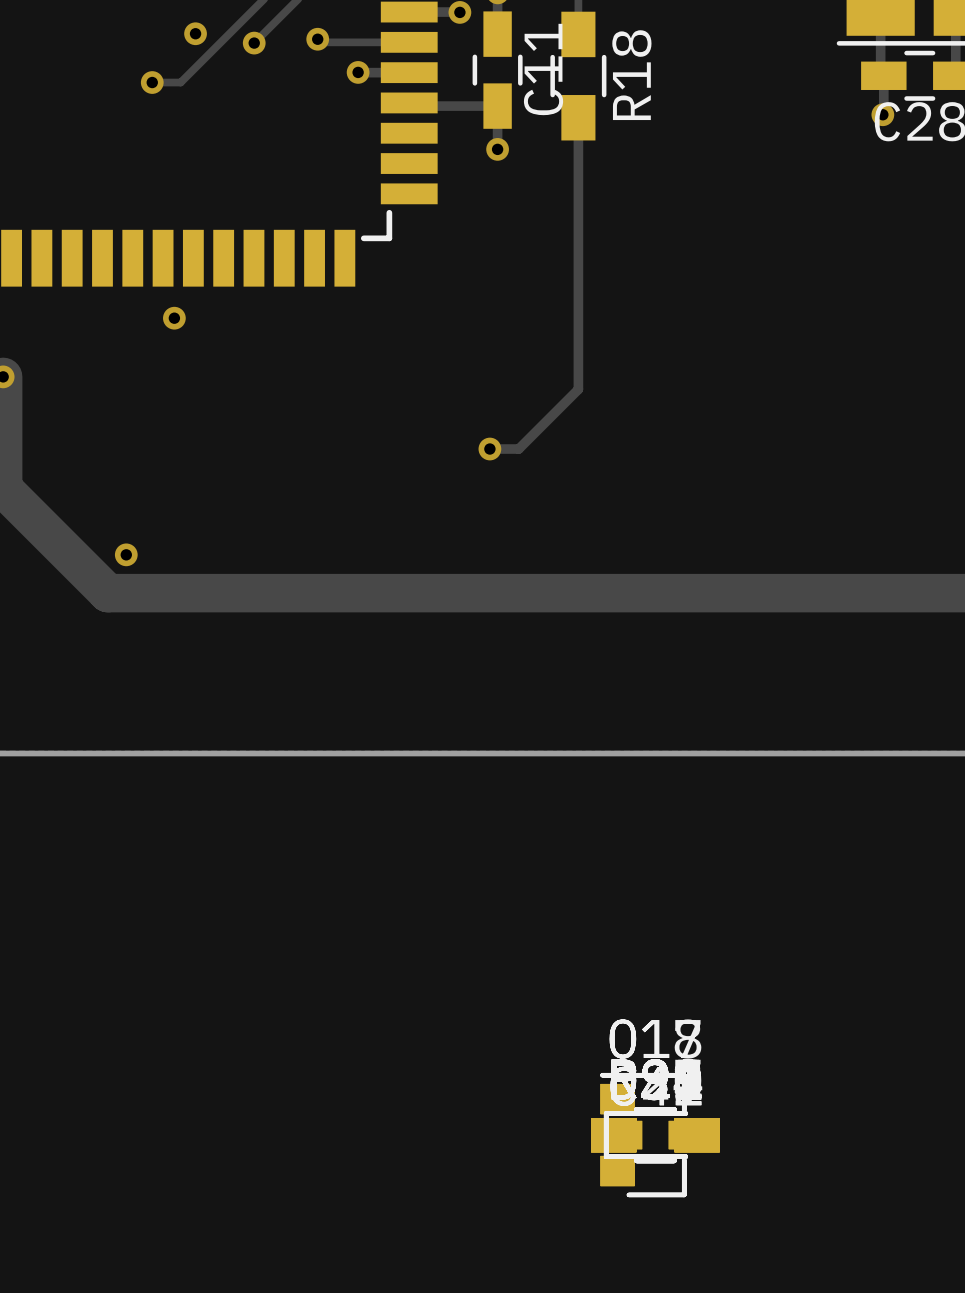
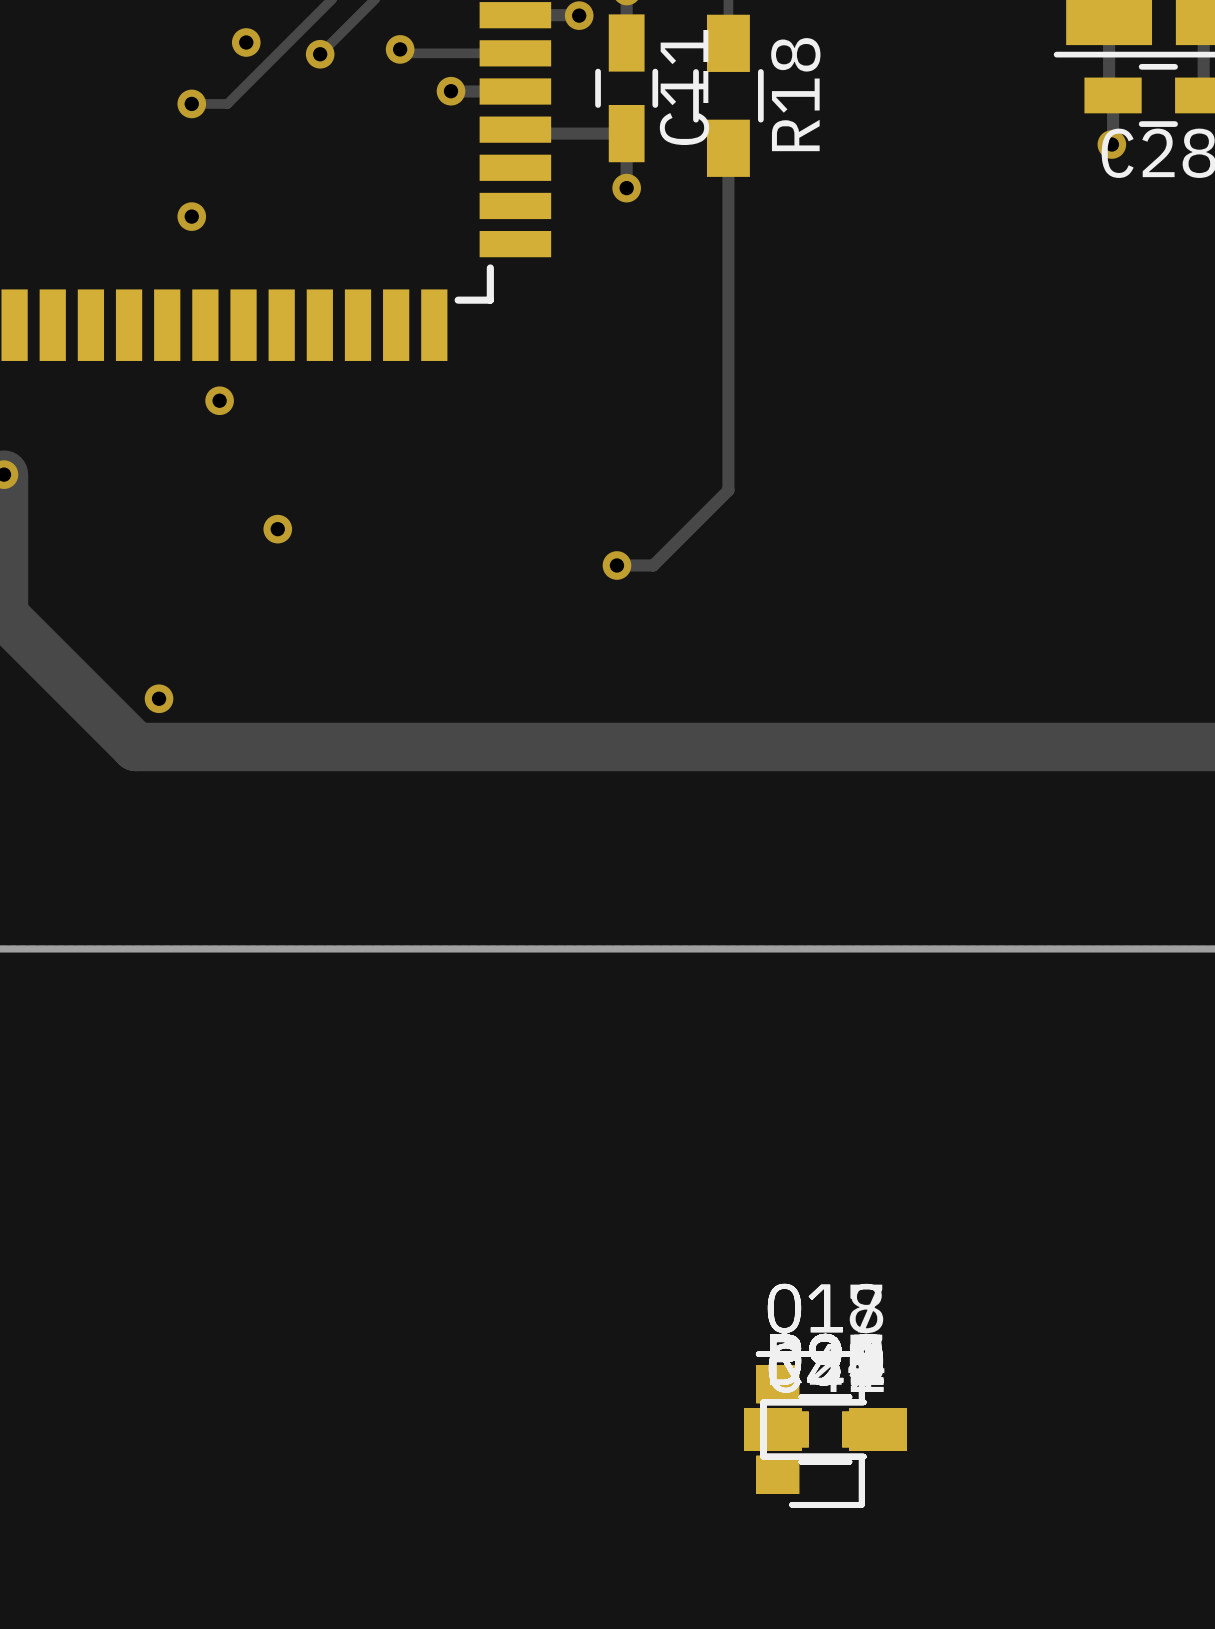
via: none -> (191, 216)
via: none -> (277, 529)

